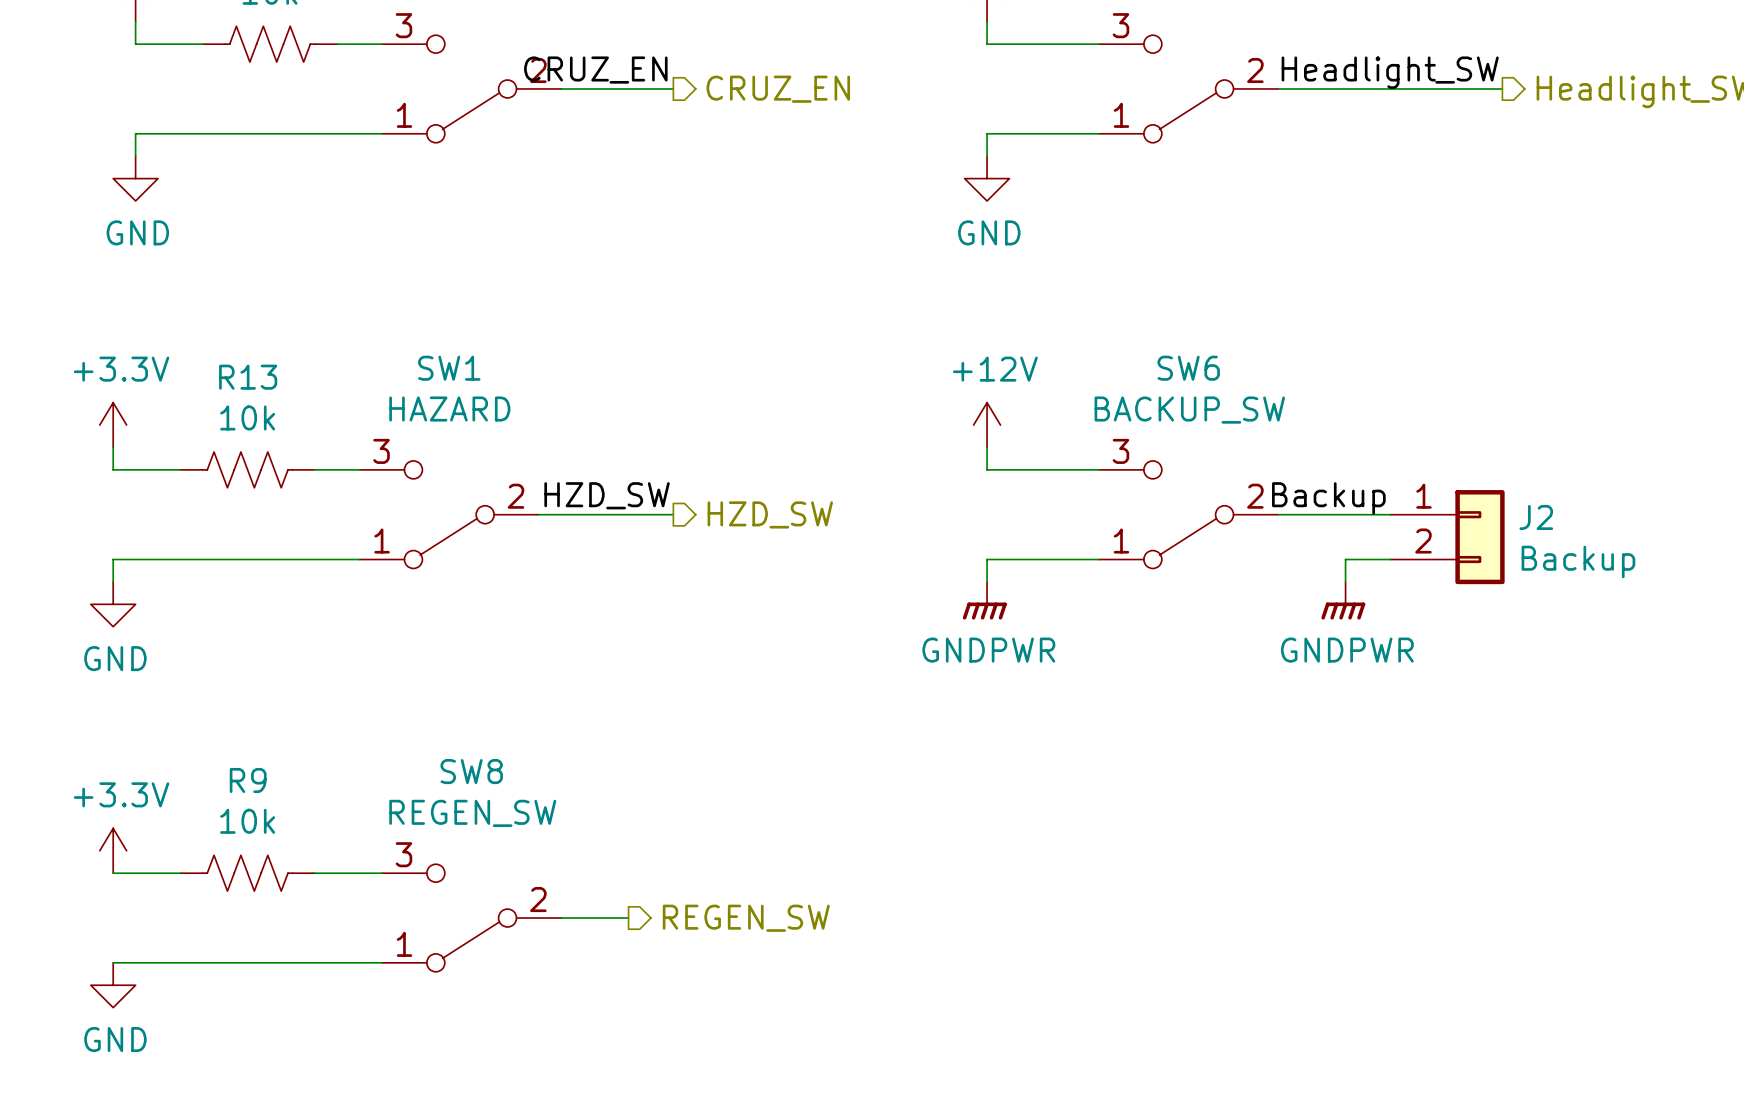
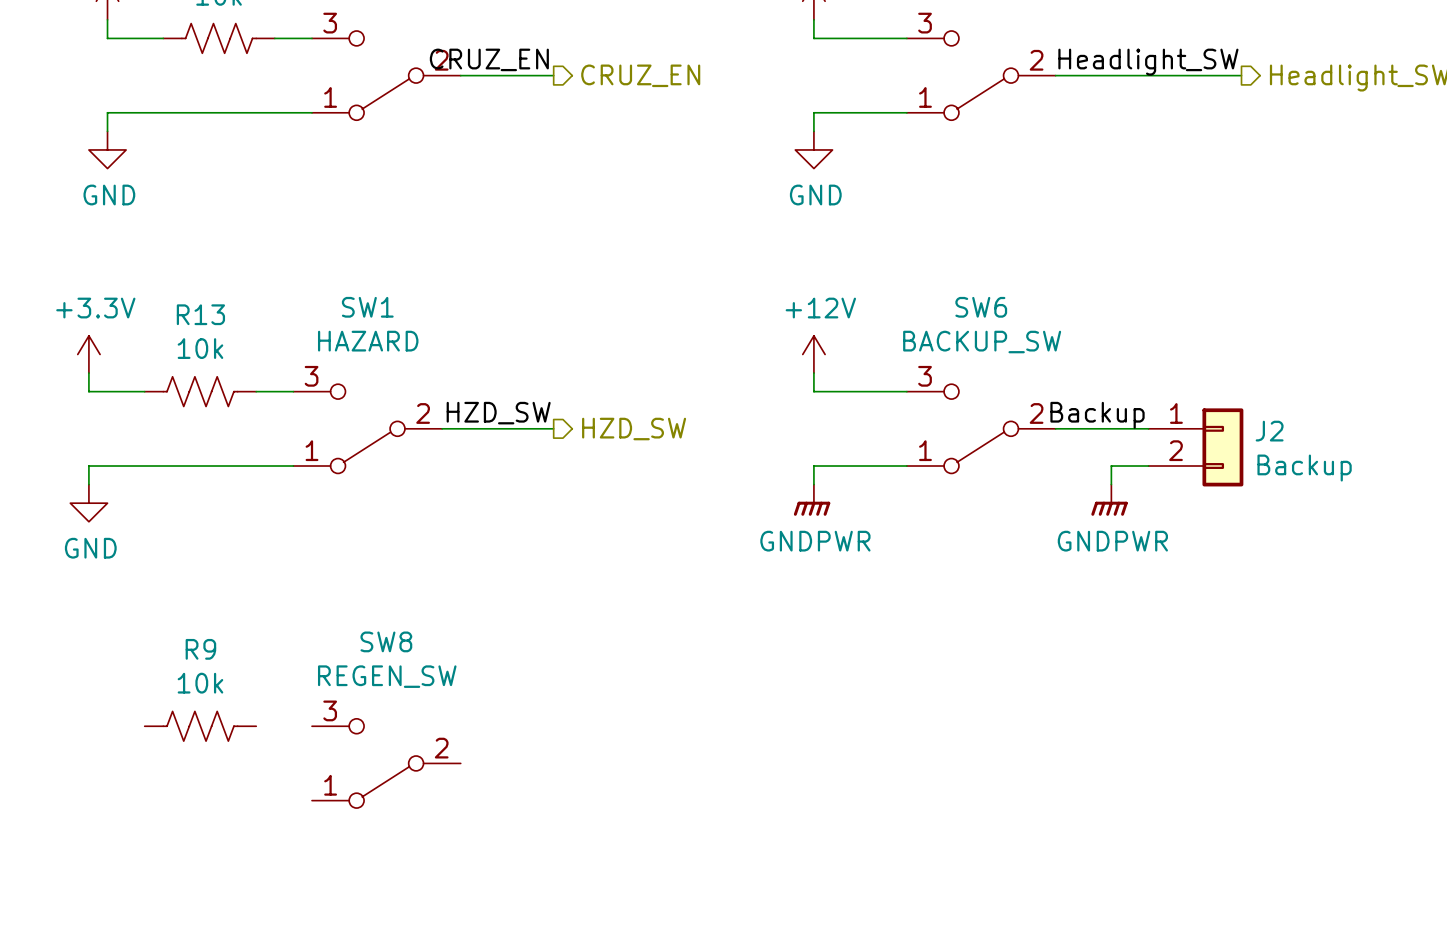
power symbol: +3.3V (113, 850) -> none
wire: (113, 873) (180, 873) -> none
wire: (314, 873) (382, 873) -> none
wire: (561, 918) (628, 918) -> none
hierarchical label: REGEN_SW (746, 918) -> none
wire: (113, 962) (382, 962) -> none
power symbol: GND (113, 985) -> none

